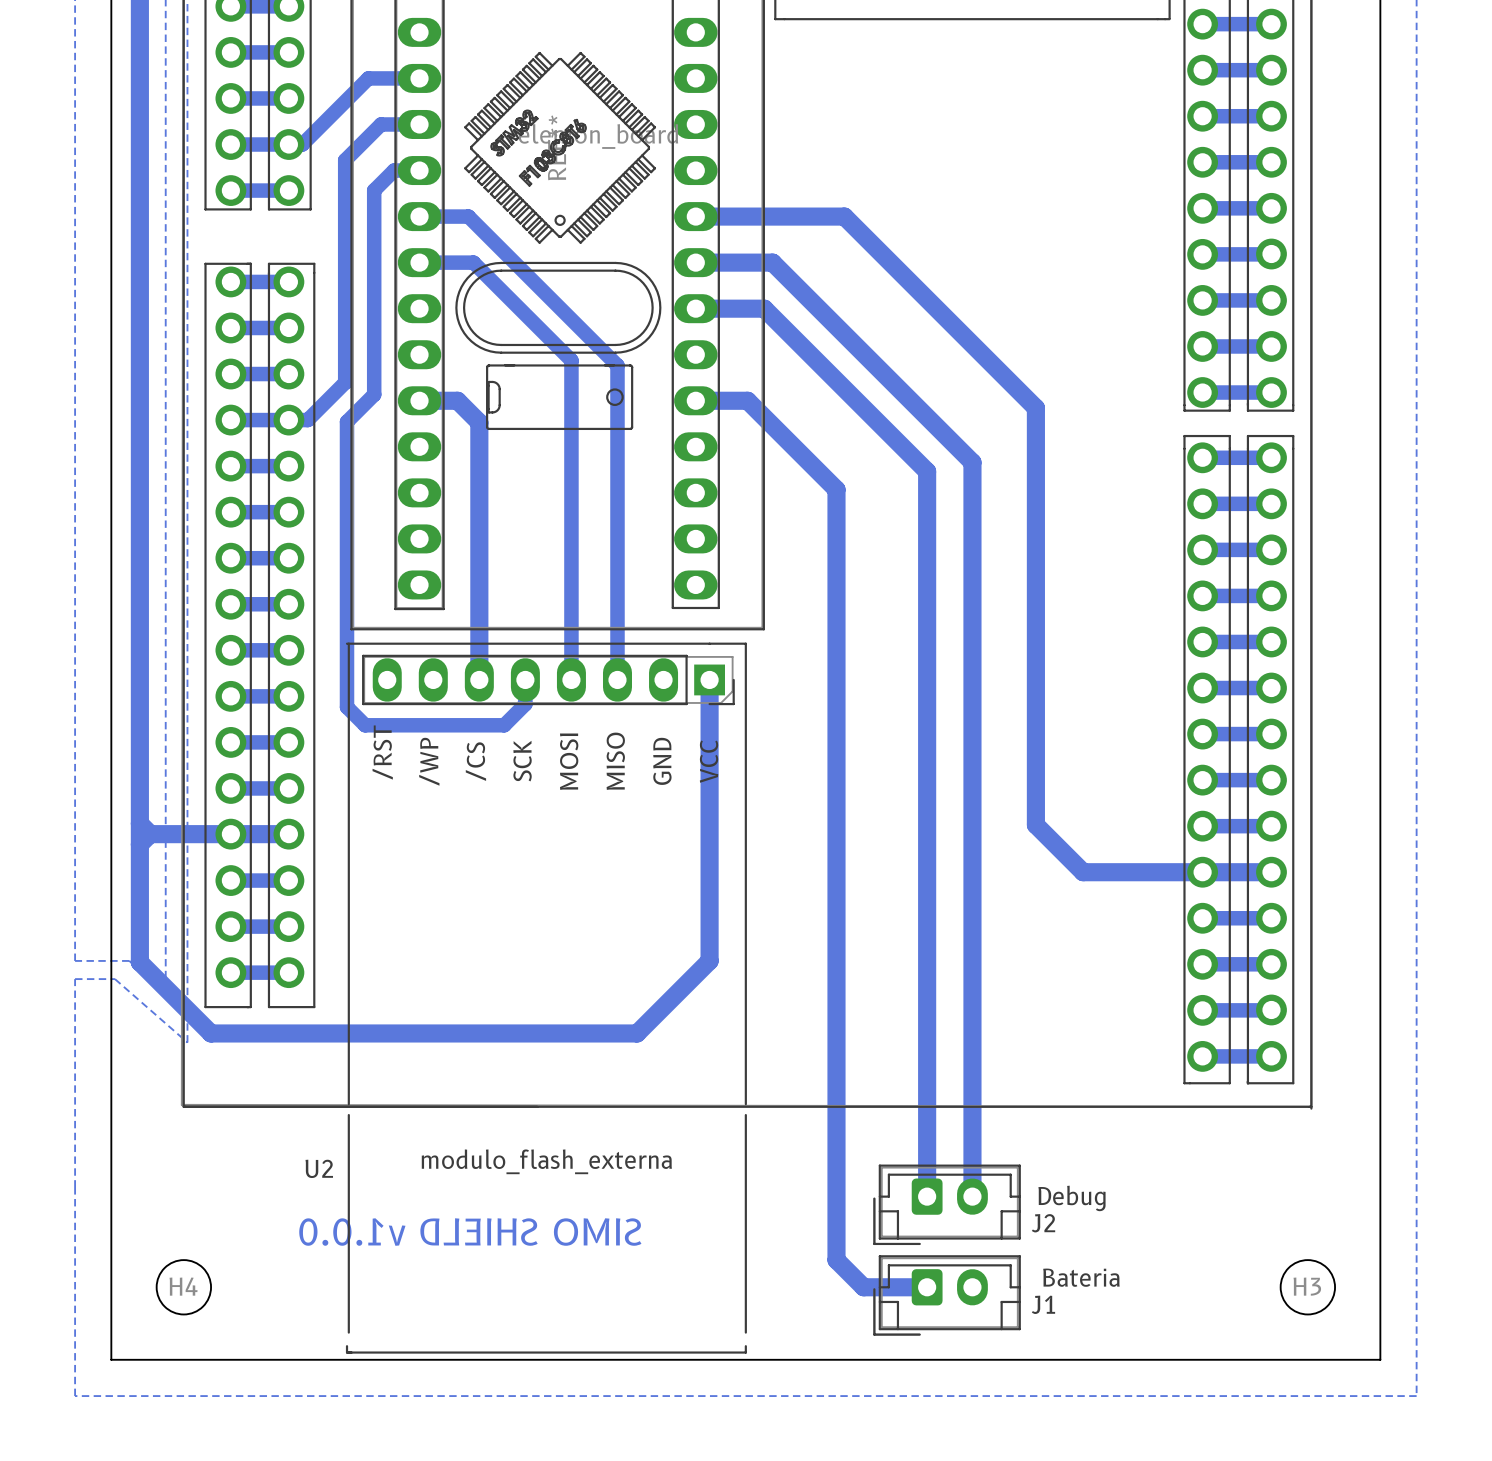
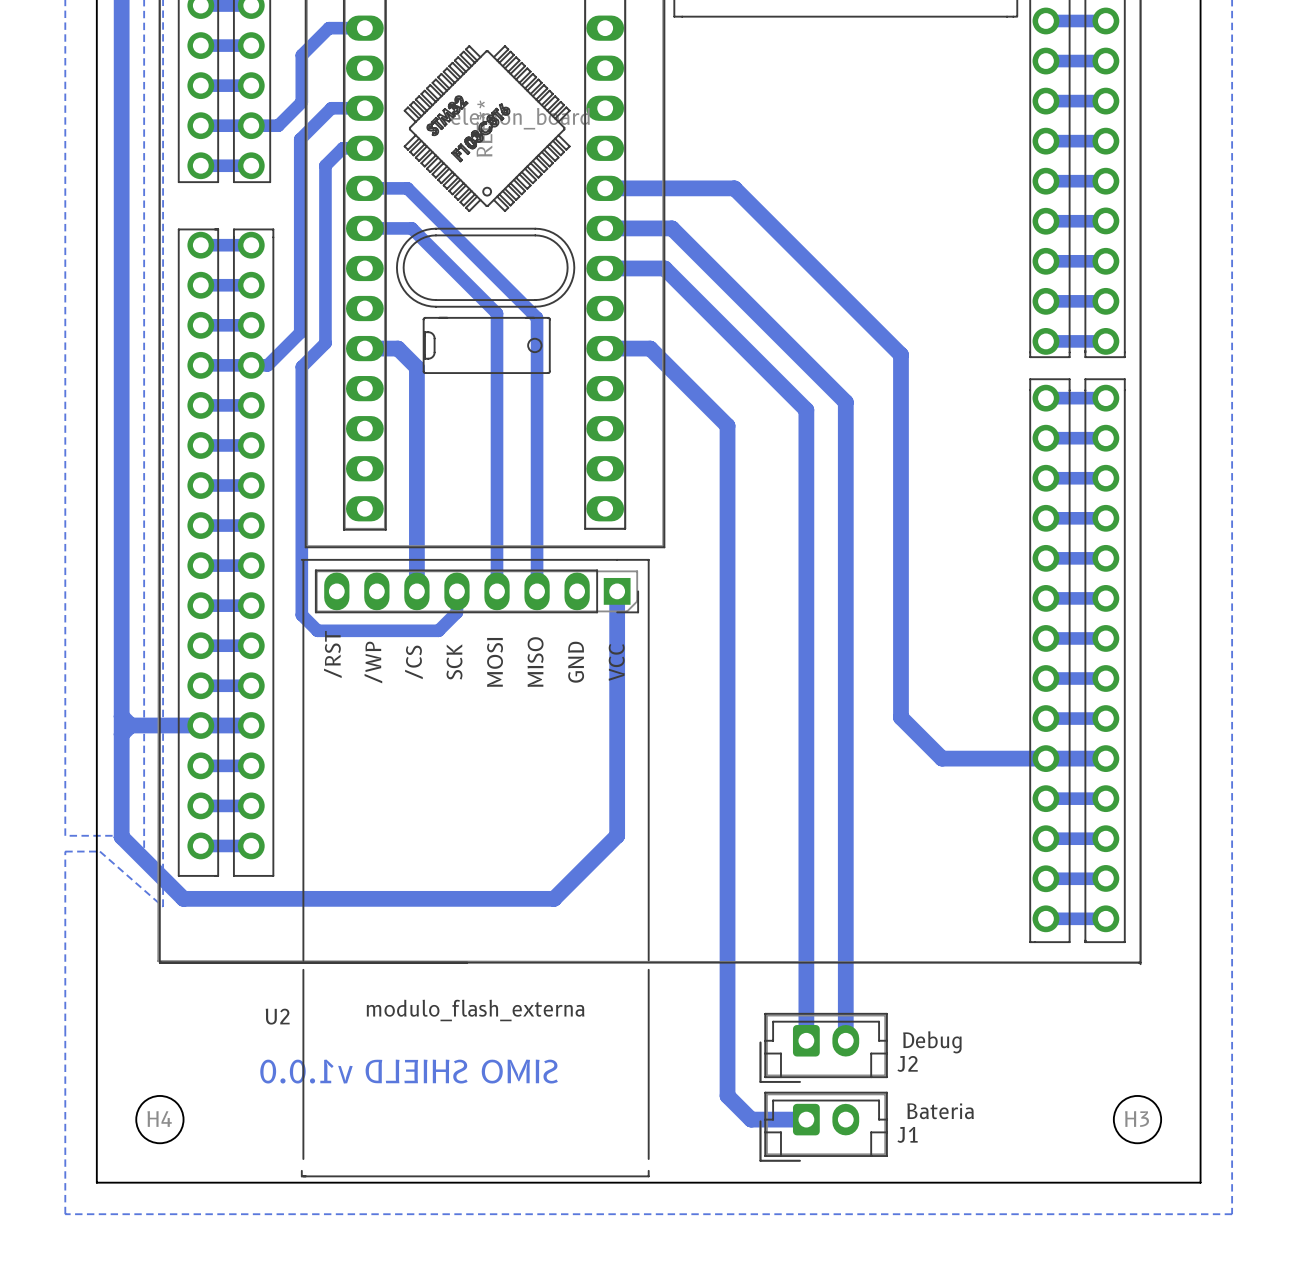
bottom track: (419, 78) (368, 78) (302, 144) -> (364, 28) (328, 28) (301, 55) (301, 102) (278, 125) (262, 125)

